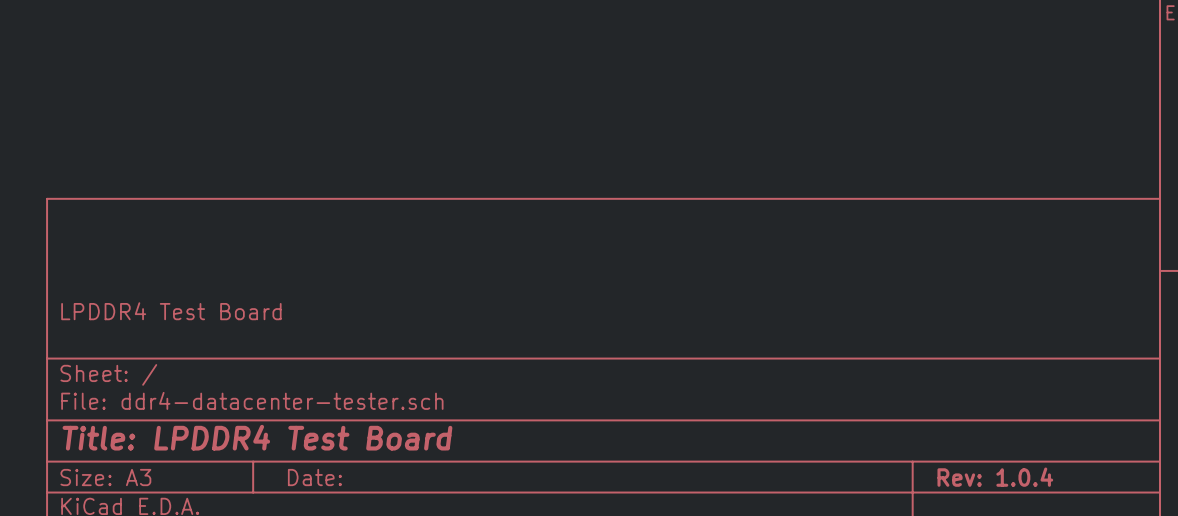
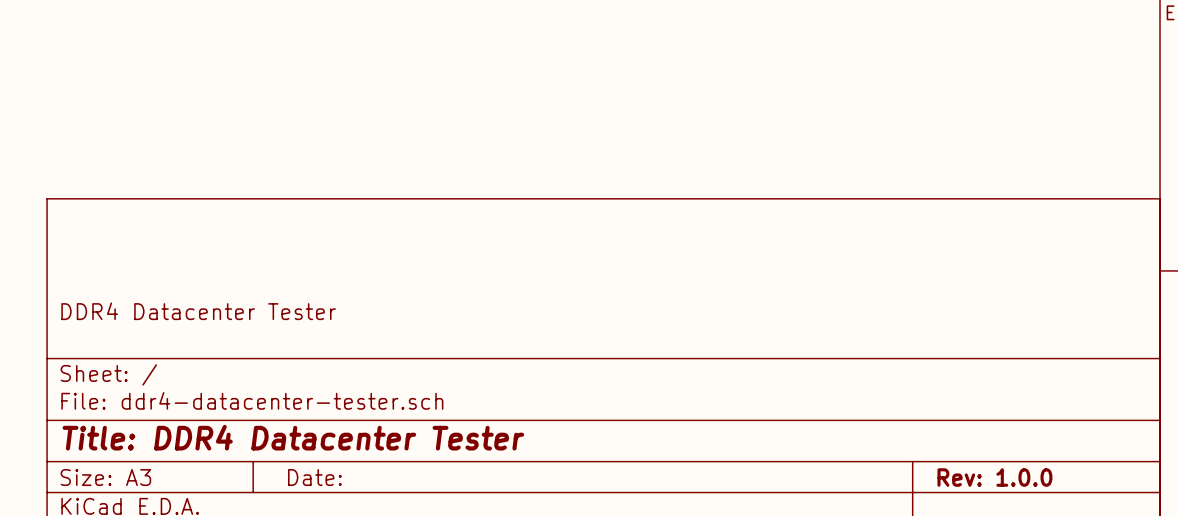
title block: LPDDR4 Test Board (171, 311) -> DDR4 Datacenter Tester (198, 311)
title block: Title: LPDDR4 Test Board (257, 437) -> Title: DDR4 Datacenter Tester (293, 437)
title block: Rev: 1.0.4 (995, 477) -> Rev: 1.0.0 (994, 477)

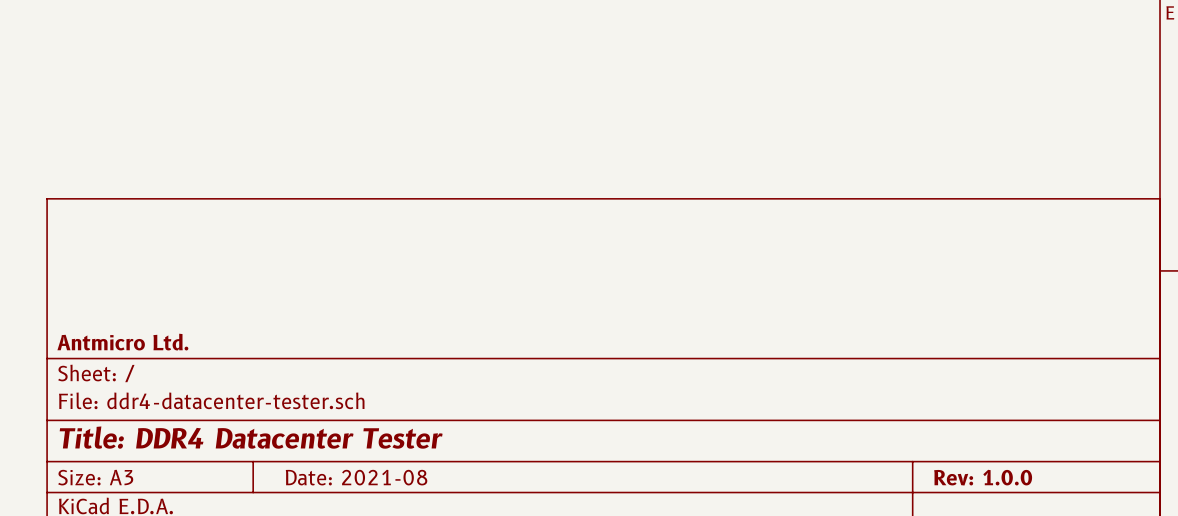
title block: DDR4 Datacenter Tester (198, 311) -> none
title block: none -> Antmicro Ltd. (122, 342)
title block: Date: (314, 477) -> Date: 2021-08 (356, 477)

